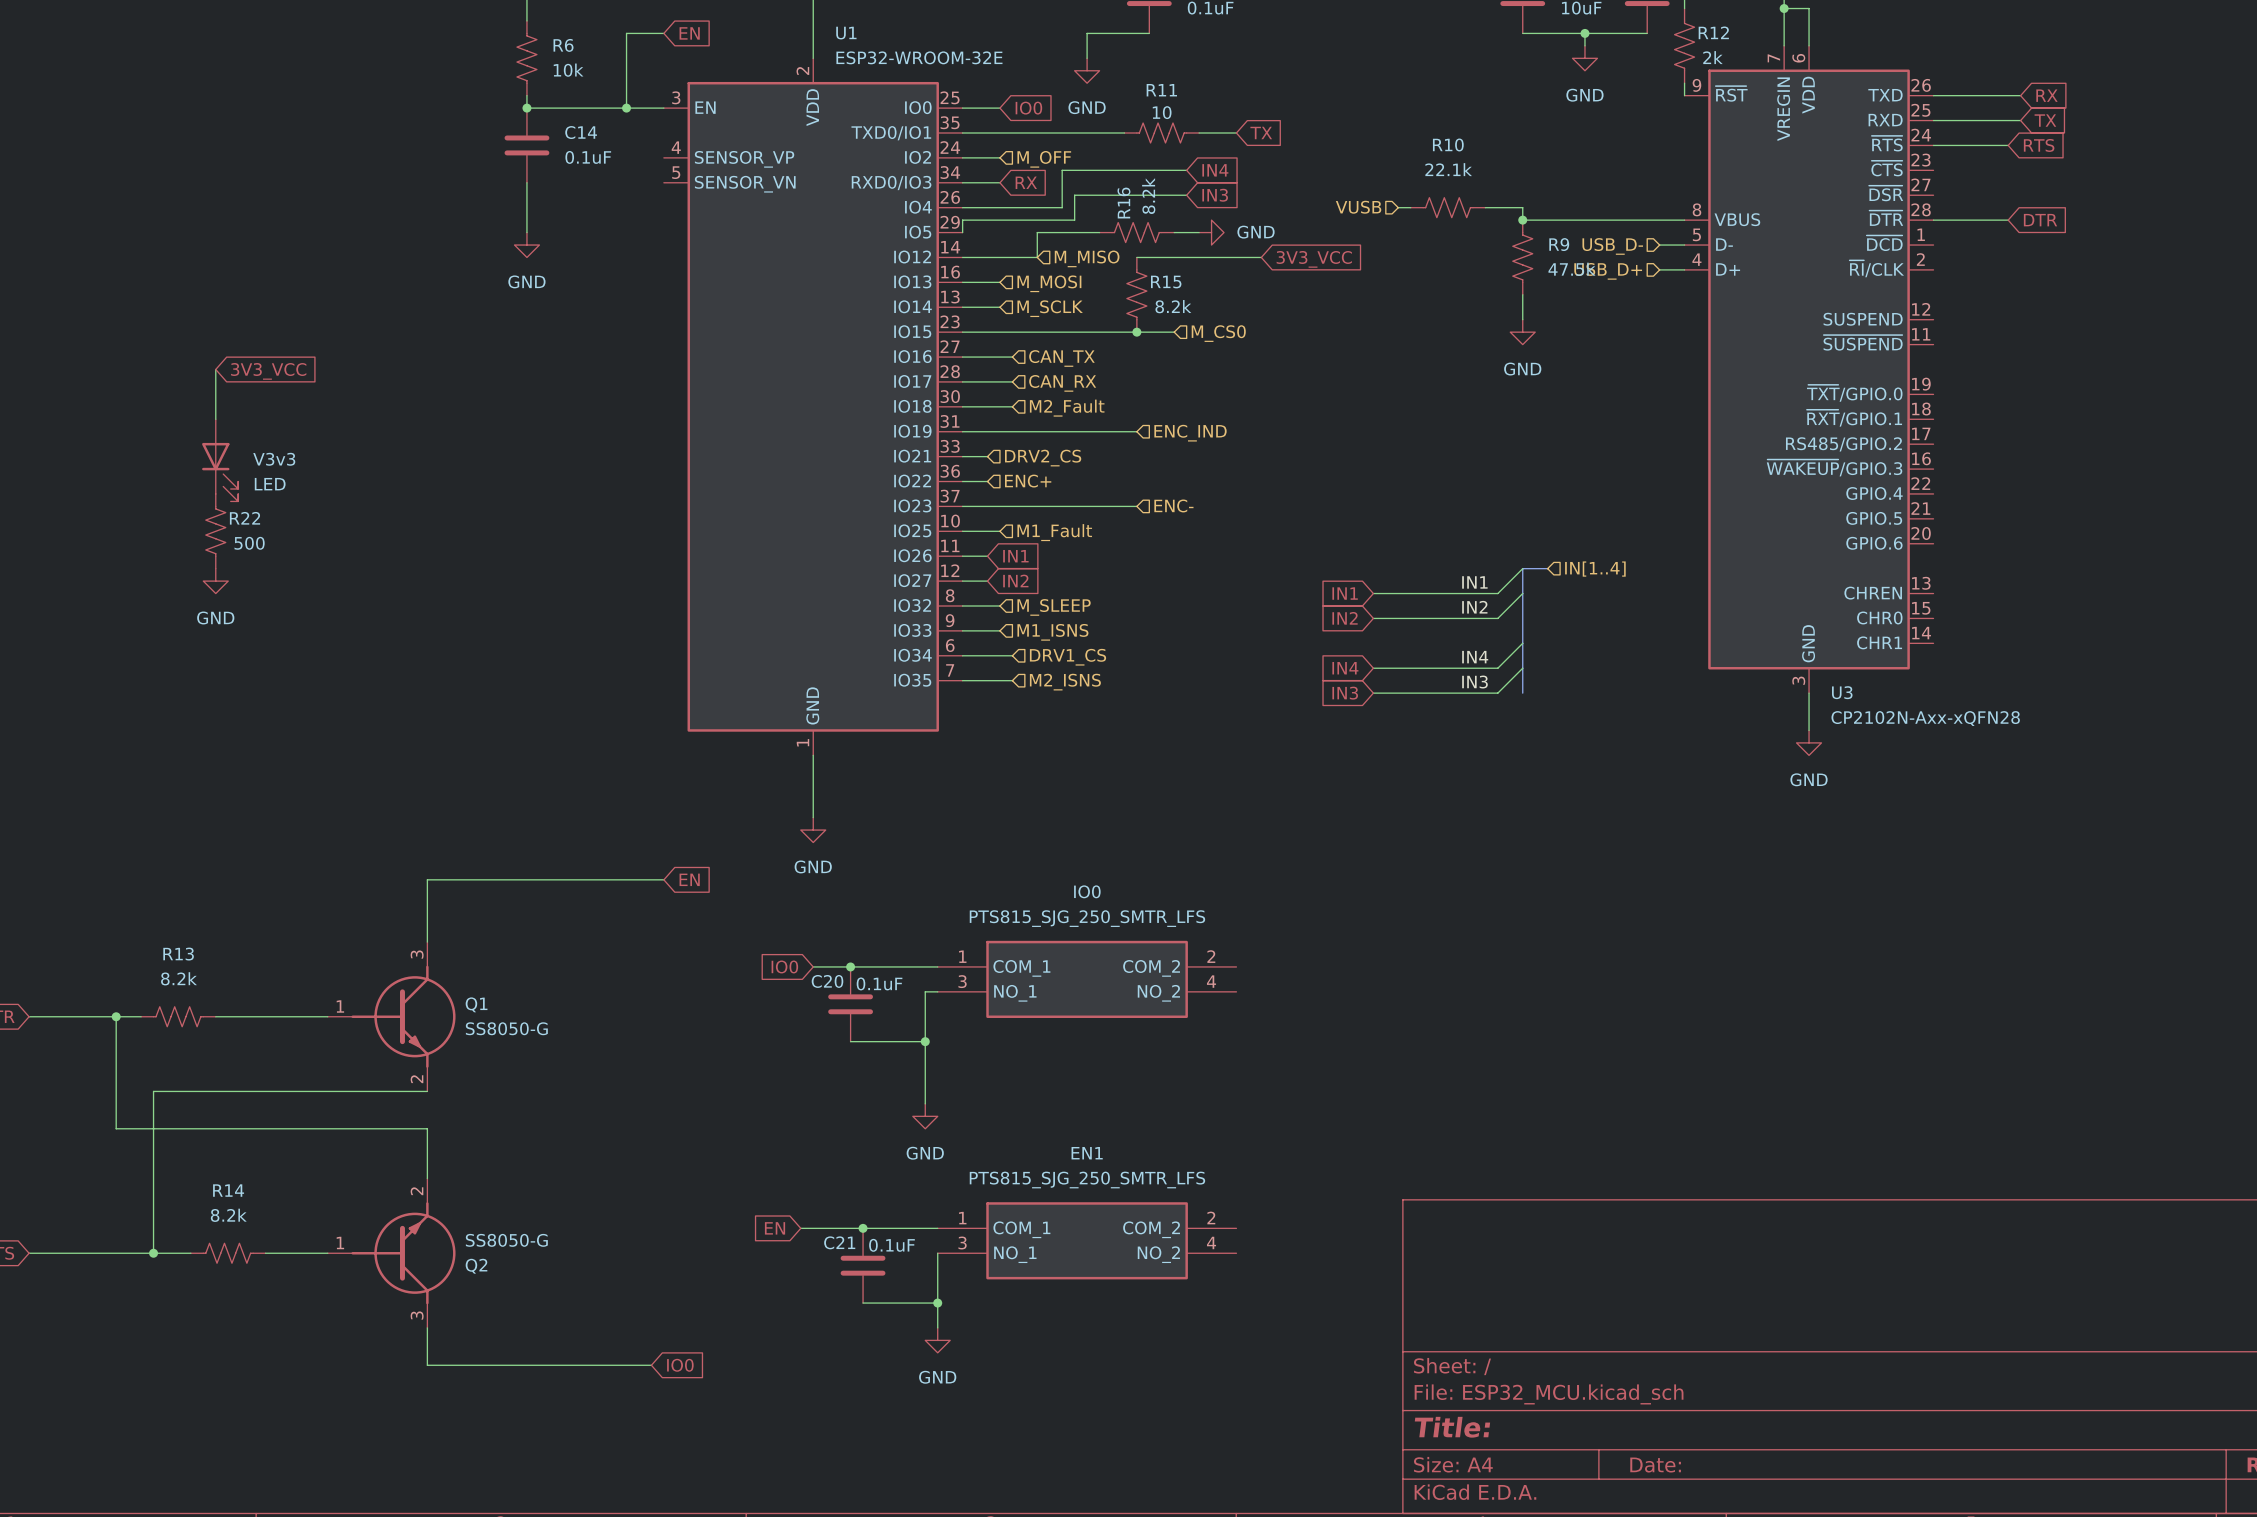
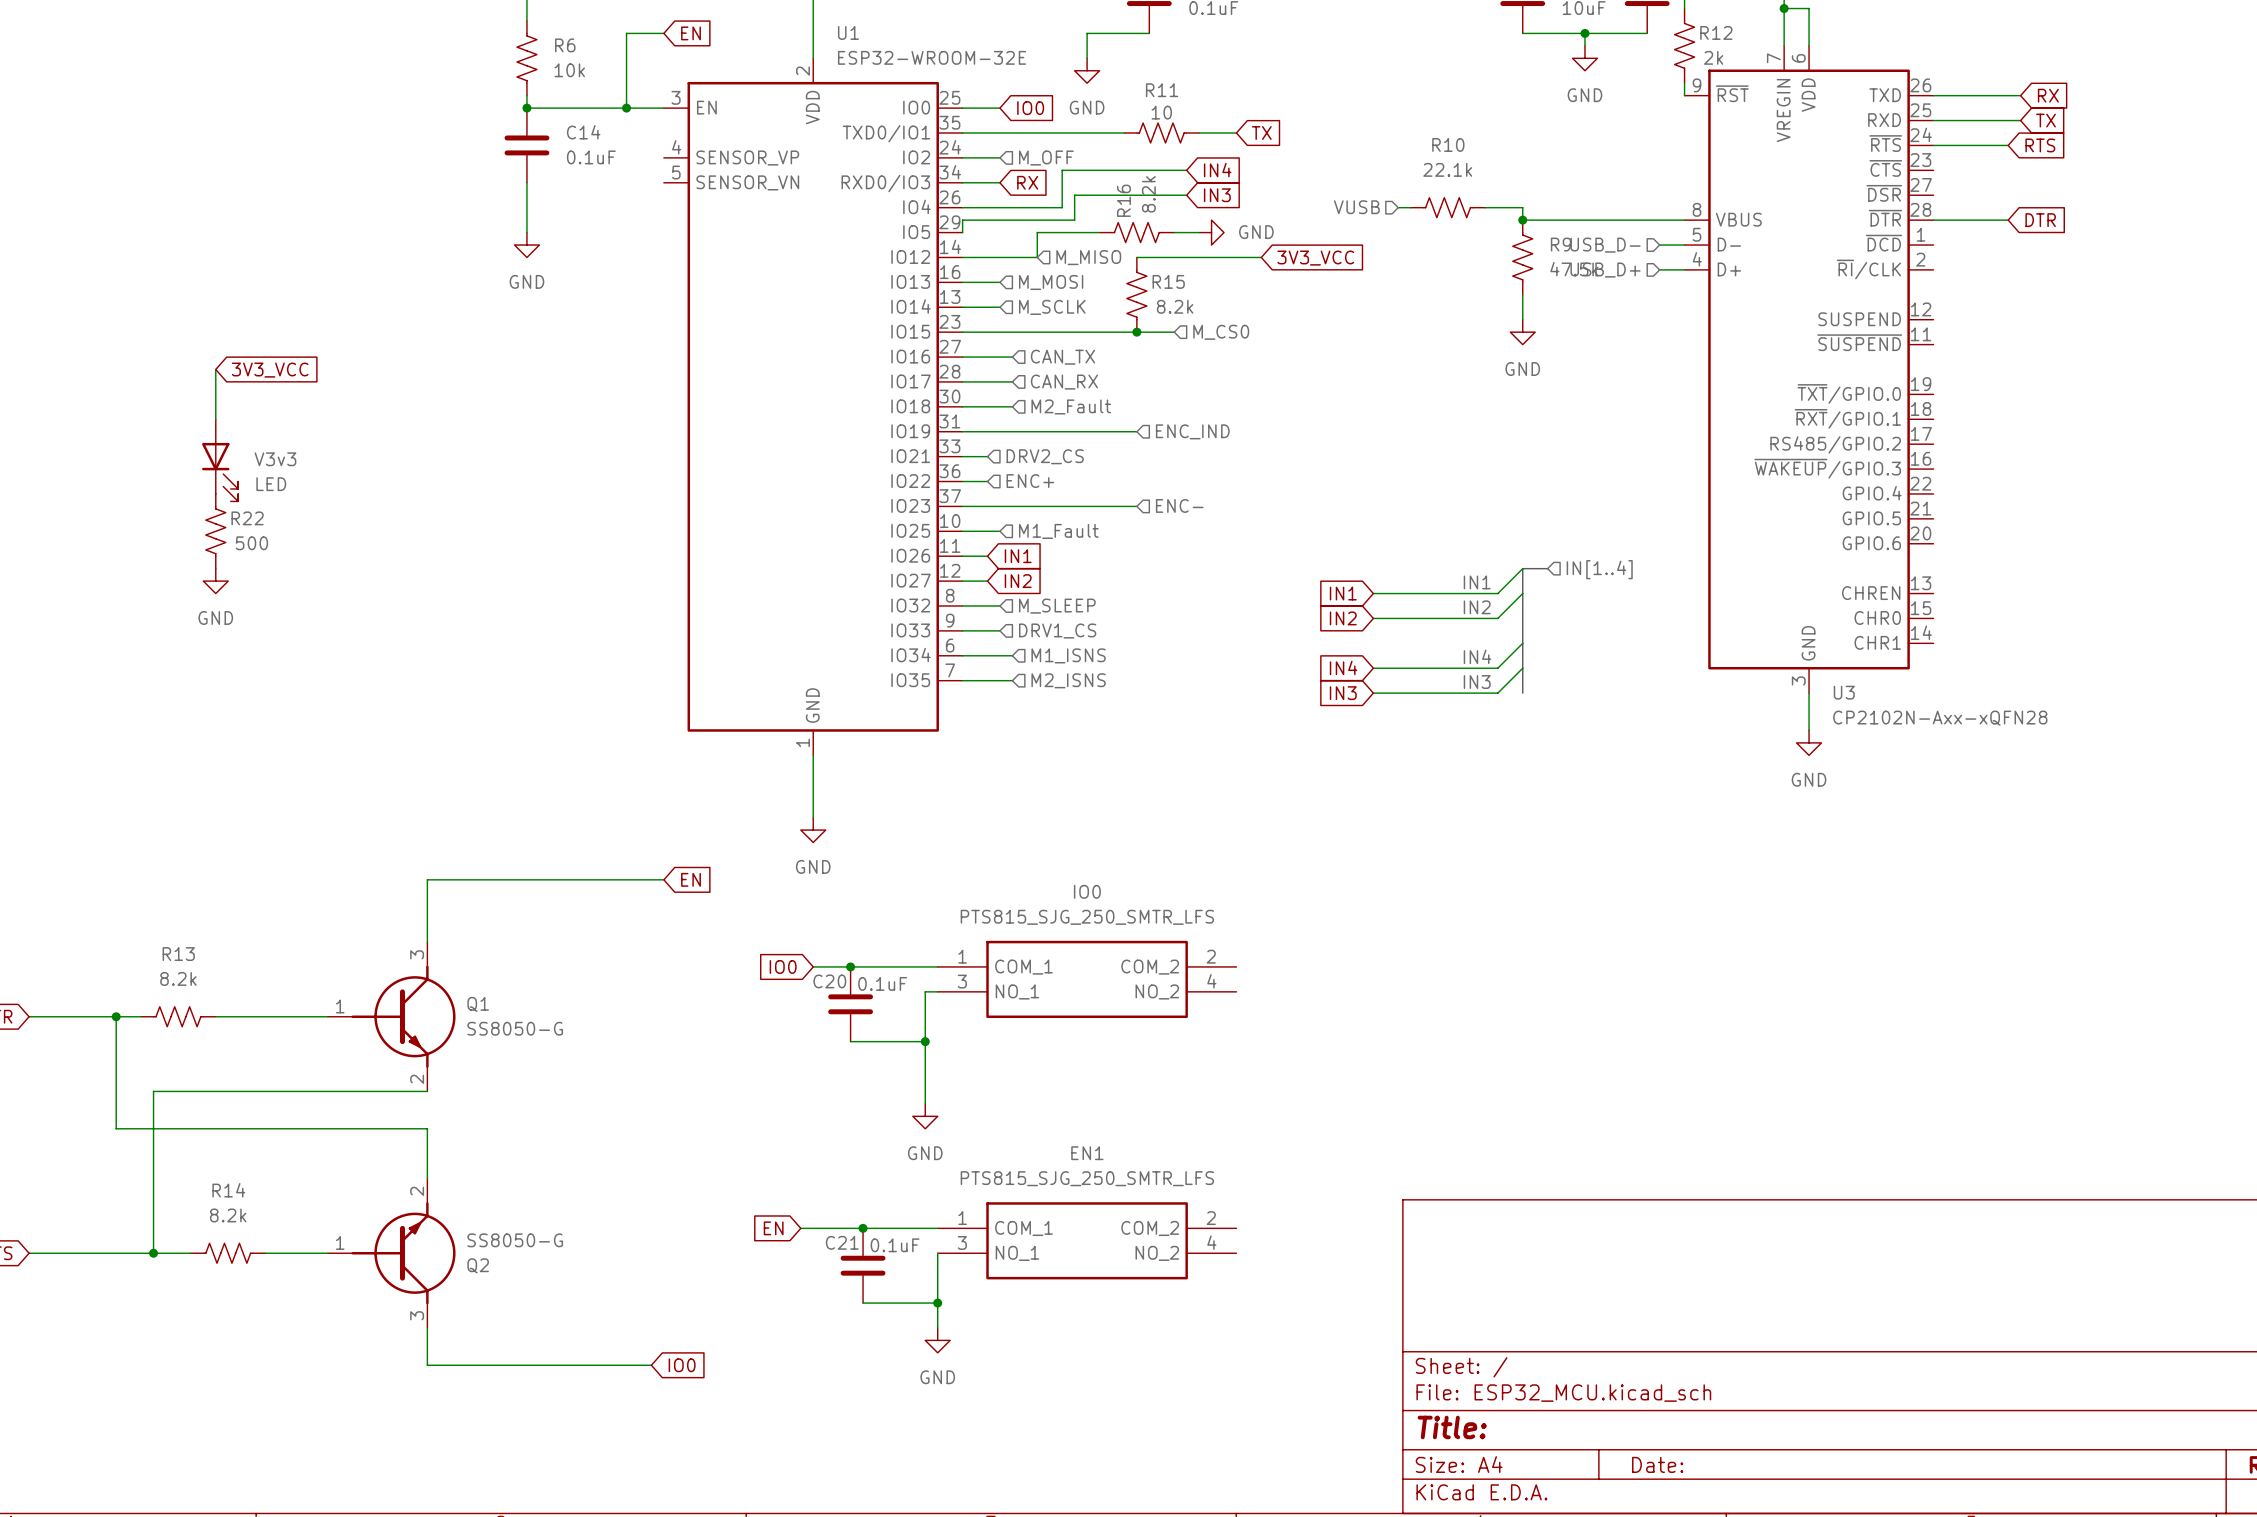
hierarchical label: M1_ISNS (1052, 632) -> DRV1_CS (1057, 631)
hierarchical label: DRV1_CS (1067, 657) -> M1_ISNS (1068, 655)

